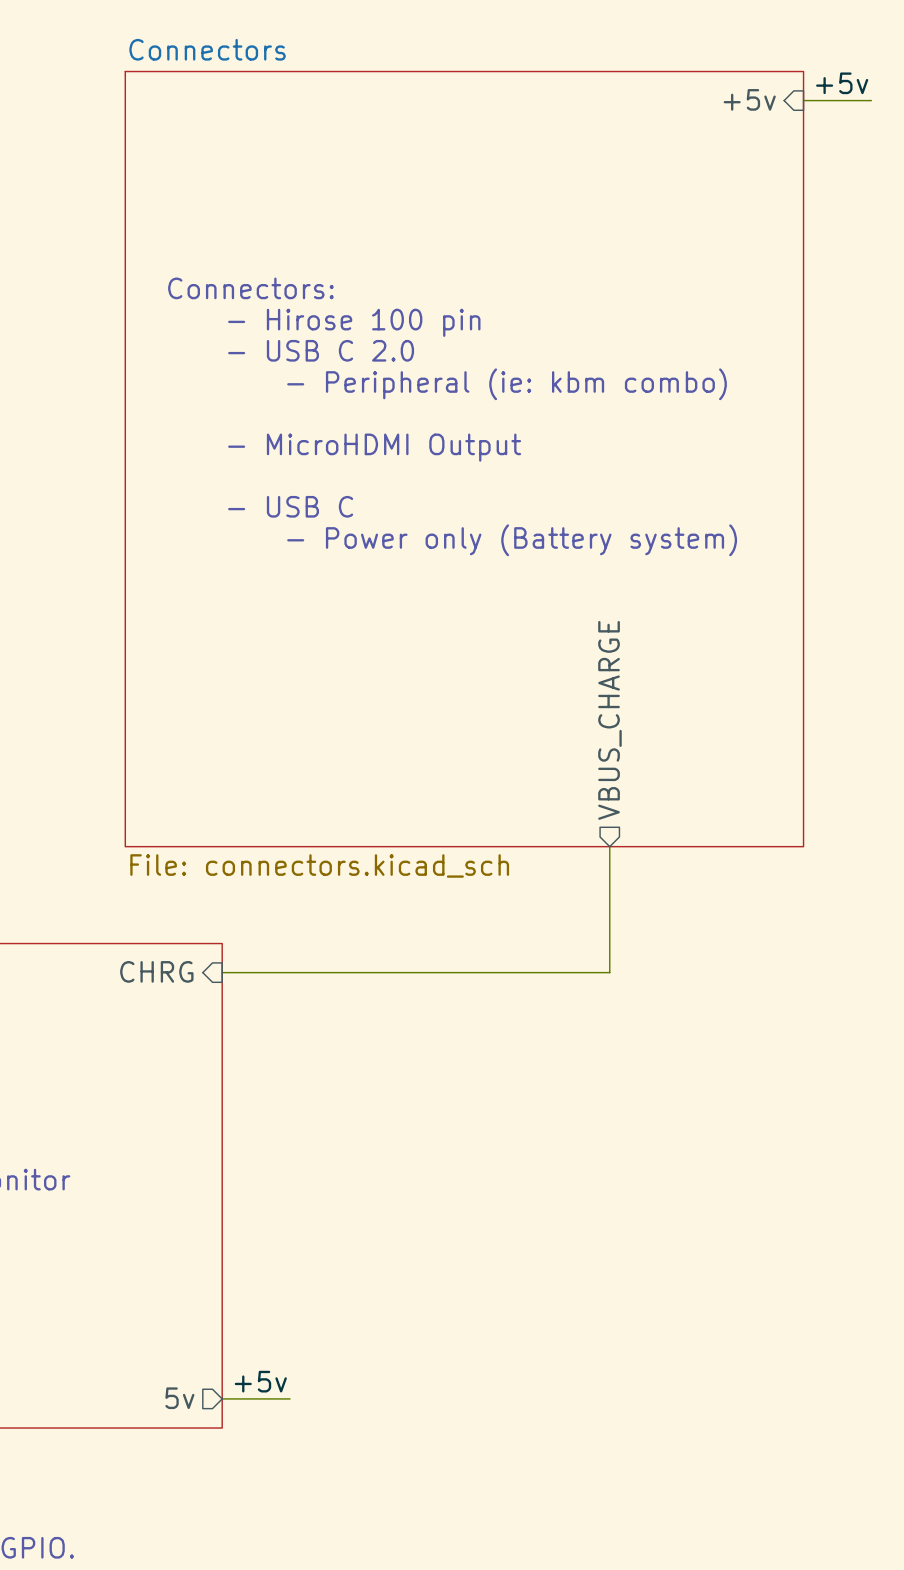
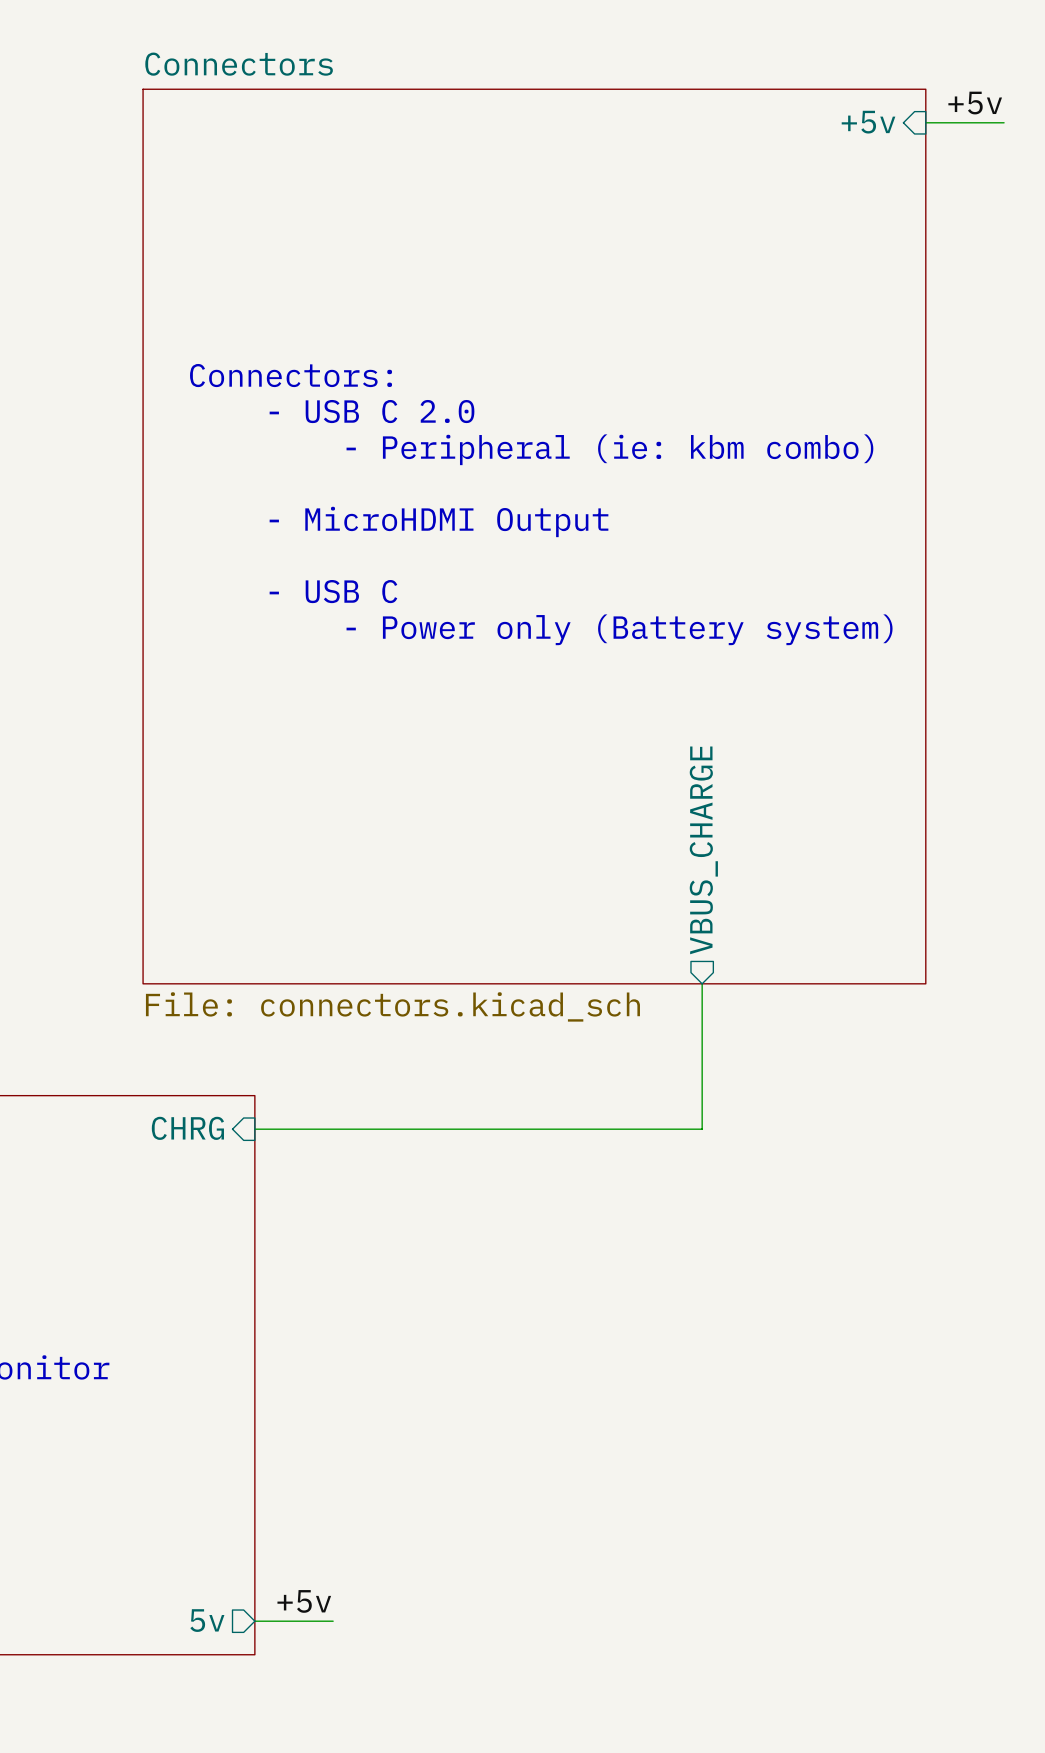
text: Connectors: (250, 288) -> none
text: - Hirose 100 pin (354, 322) -> Connectors: (291, 375)

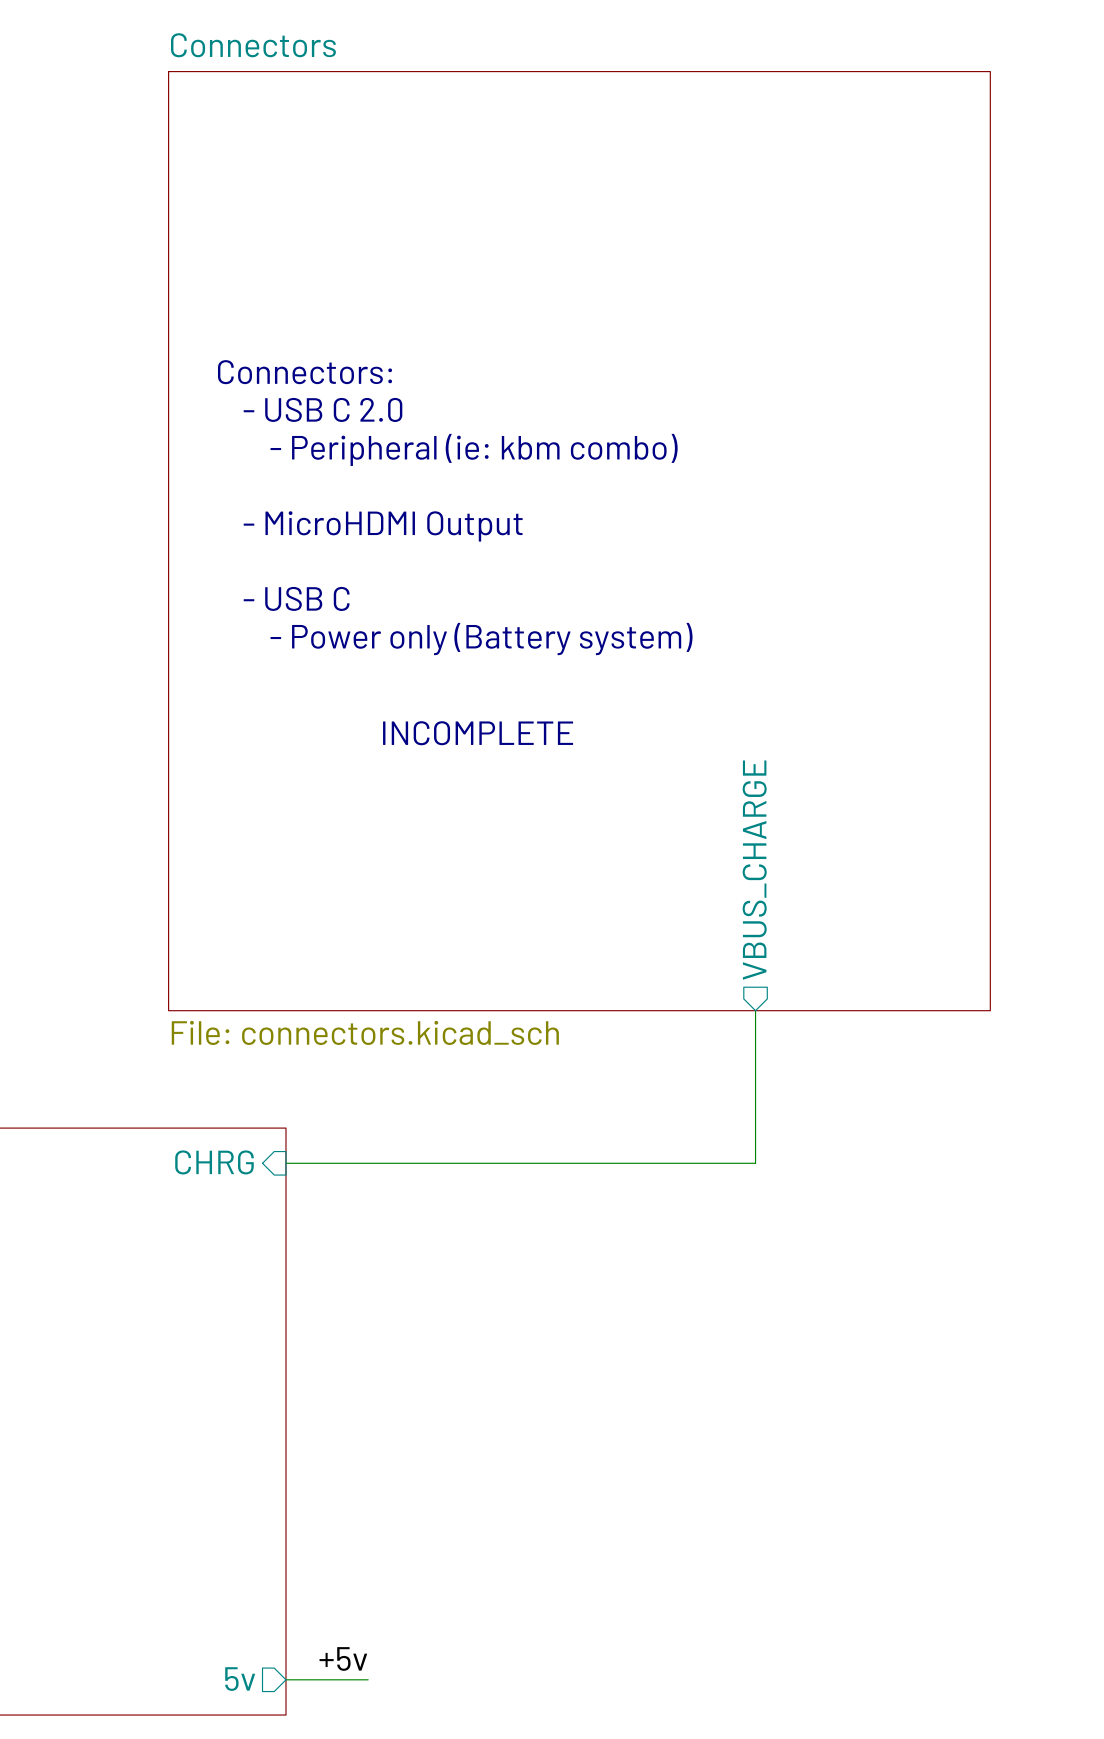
label: +5v (975, 103) -> none
sheet pin: +5v (868, 122) -> none
wire: (925, 122) (1004, 122) -> none
text: none -> INCOMPLETE (478, 733)

